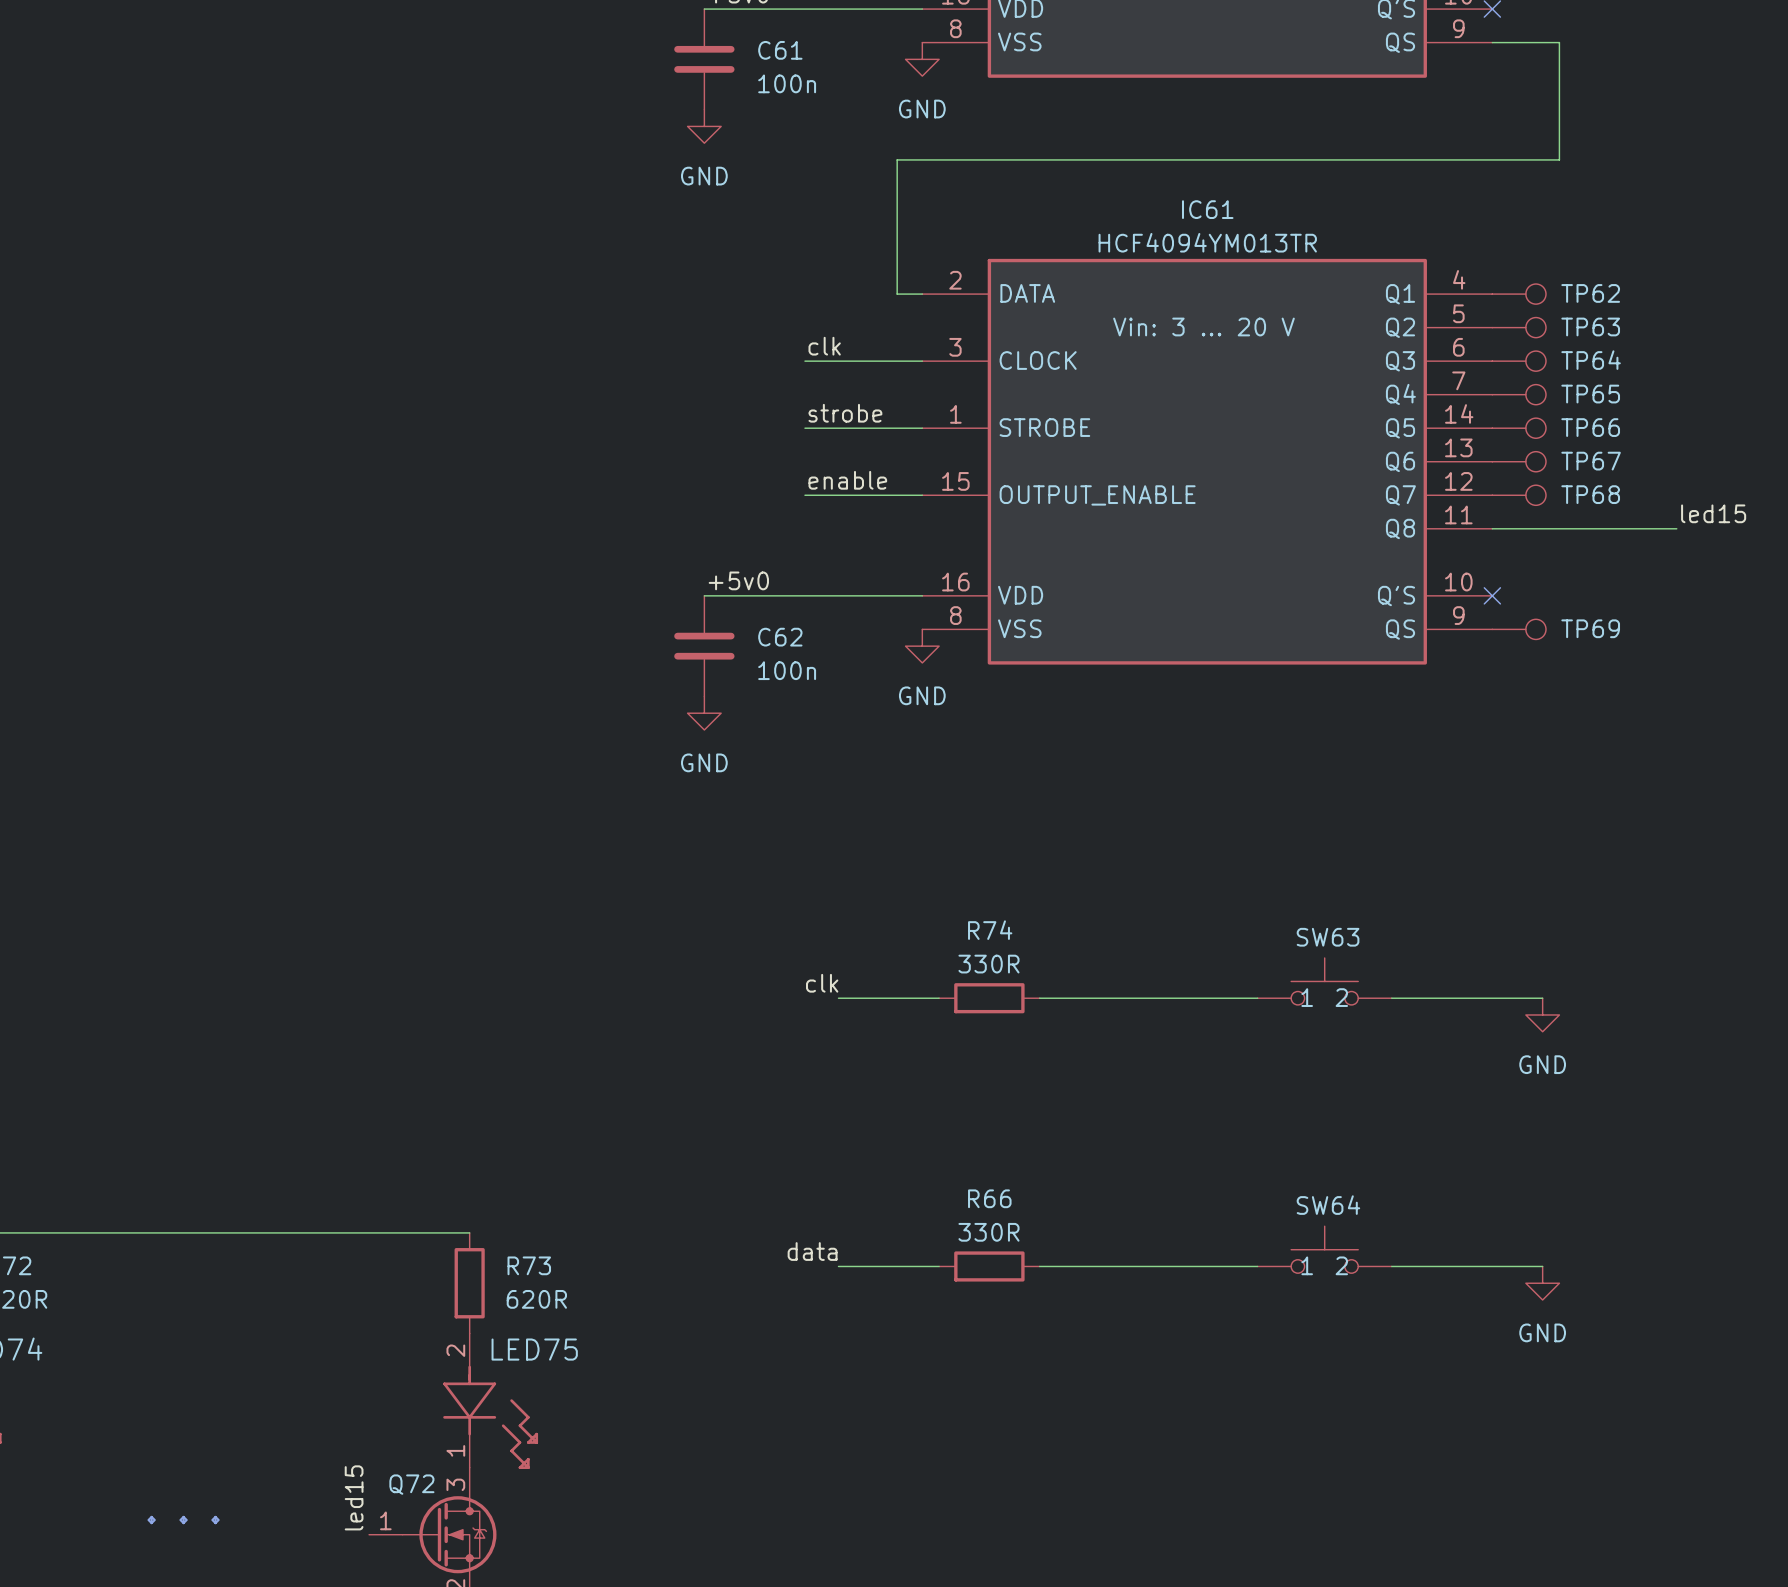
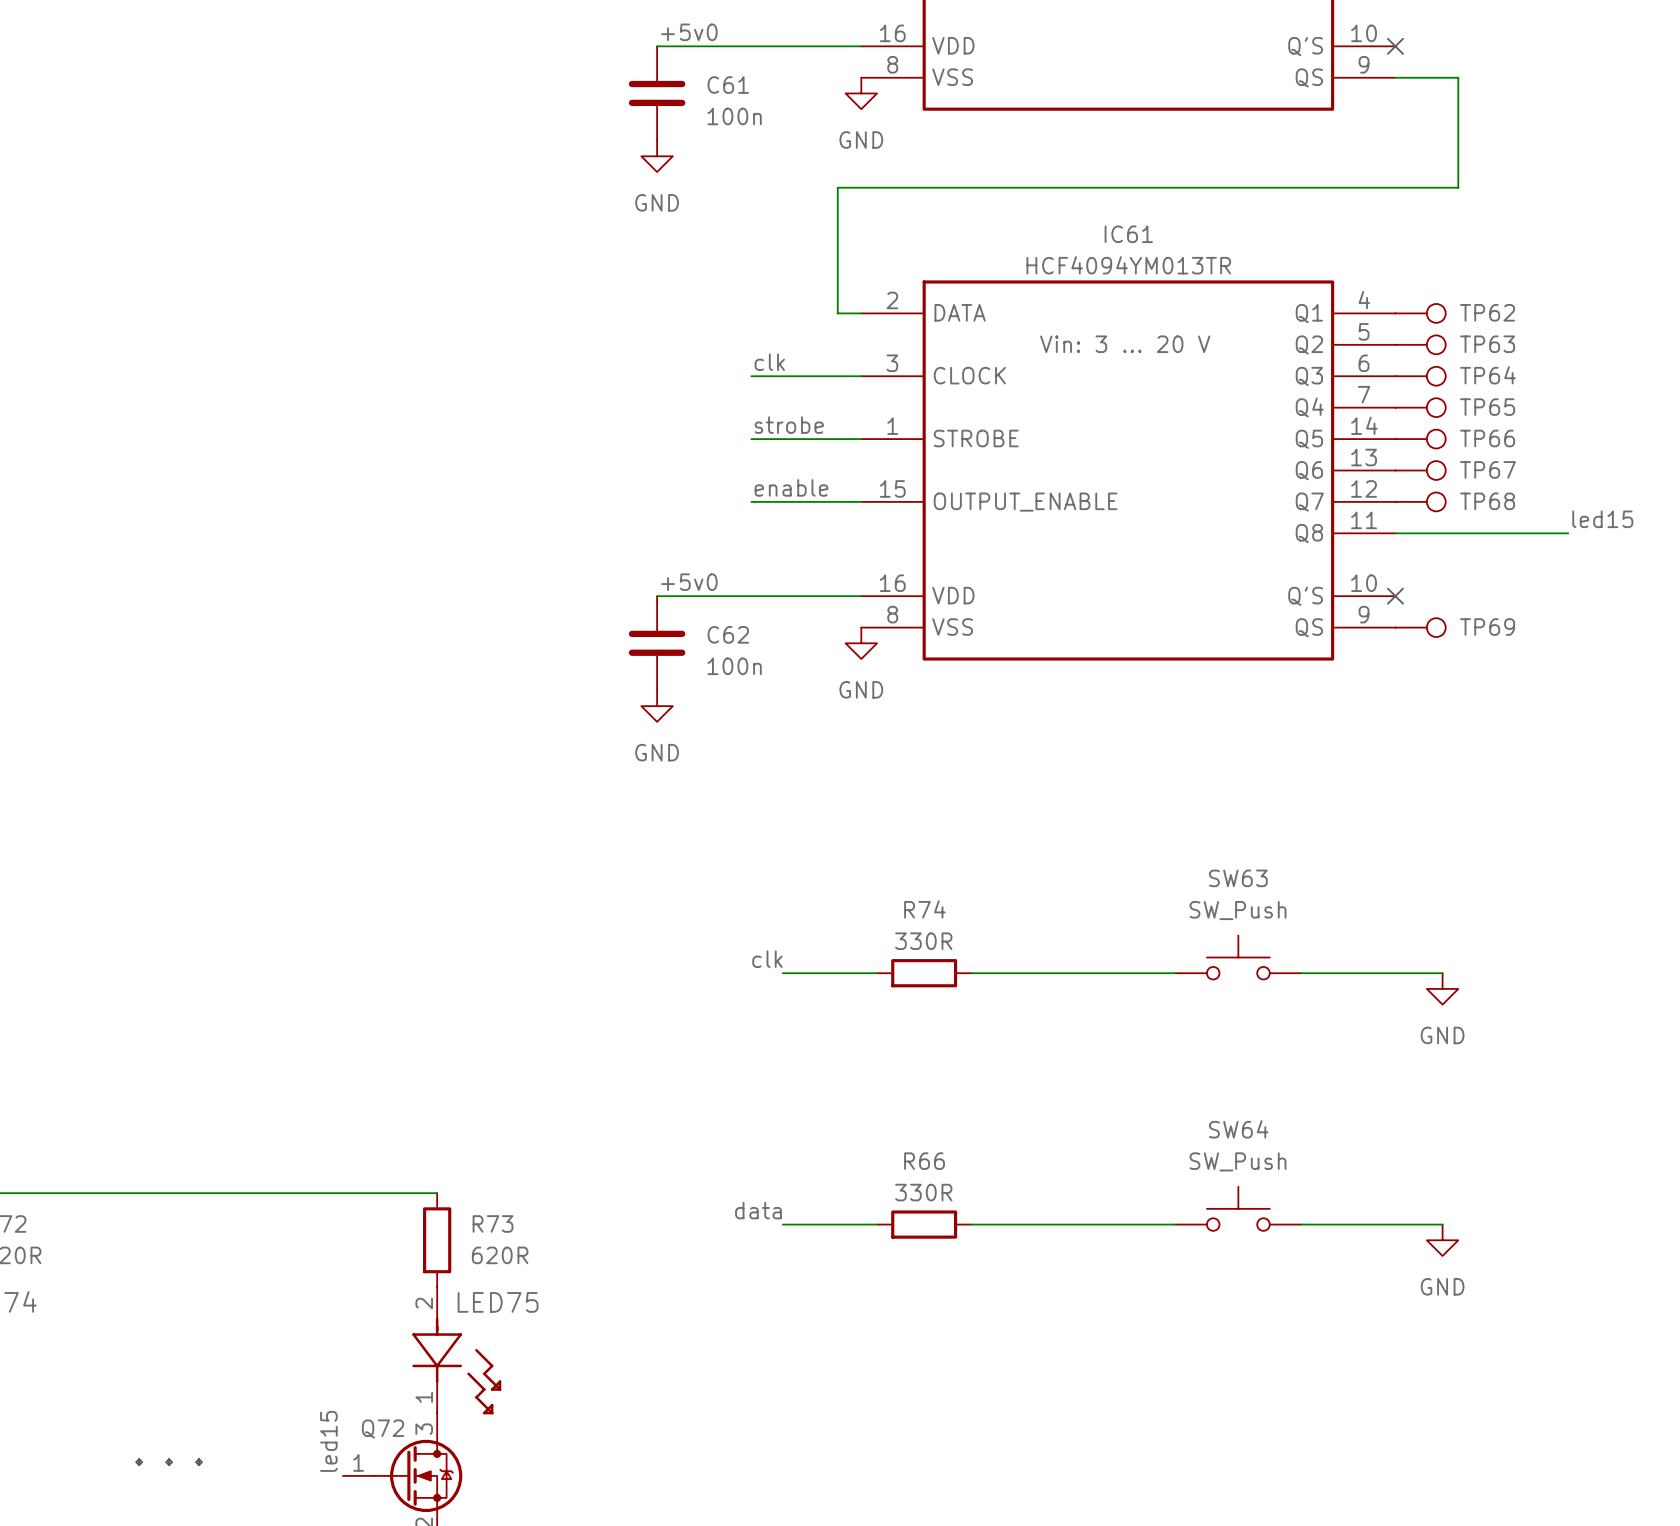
SW63 value: none -> SW_Push (1237, 910)
SW63 name position: SW63 (1328, 937) -> SW63 (1238, 878)
SW63 pin name: 1 (1307, 997) -> none
SW63 pin name: 2 (1341, 997) -> none
SW64 value: none -> SW_Push (1237, 1161)
SW64 name position: SW64 (1328, 1205) -> SW64 (1238, 1129)
SW64 pin name: 1 (1307, 1265) -> none
SW64 pin name: 2 (1341, 1265) -> none

